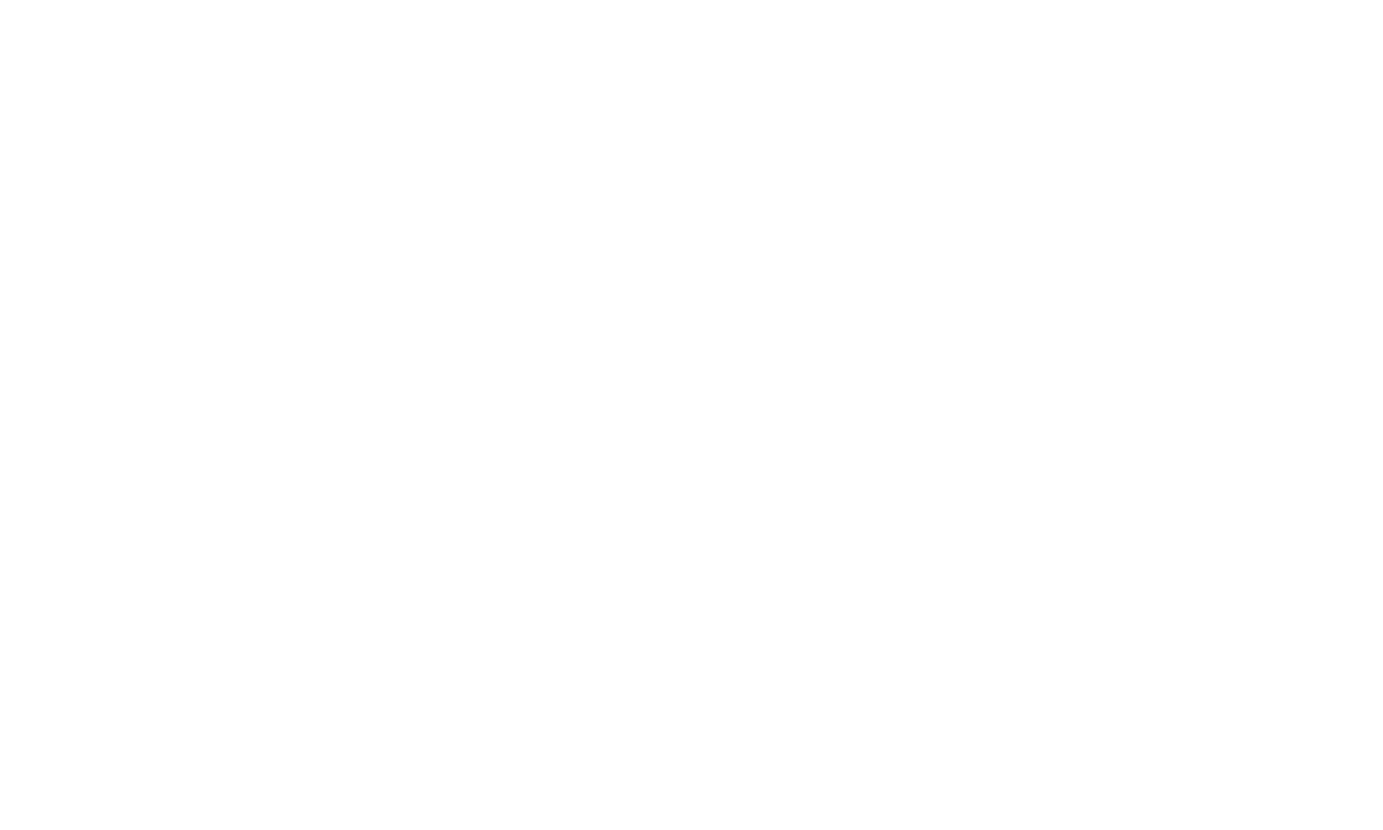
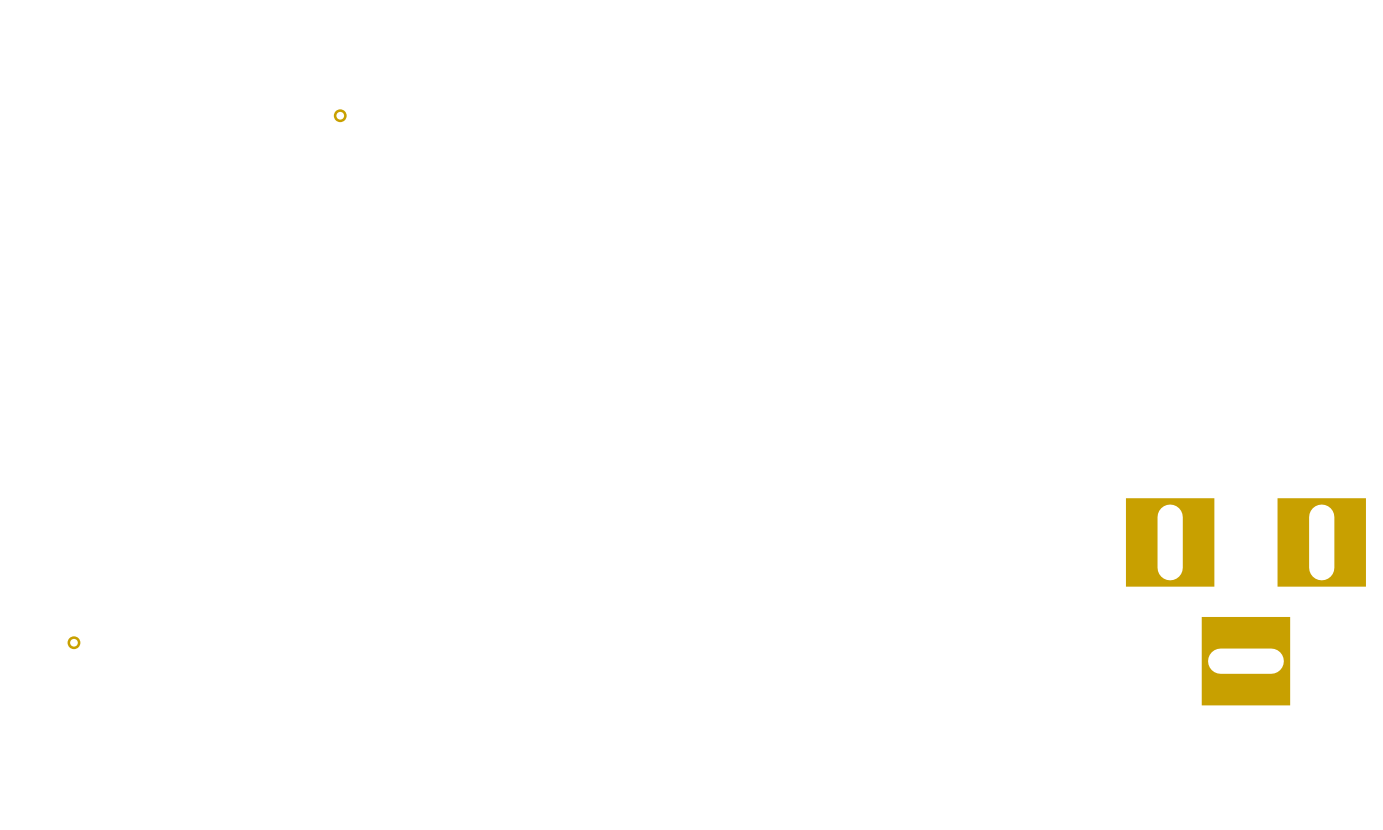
part: none -> (340, 115)
part: none -> (1245, 601)
part: none -> (73, 642)

